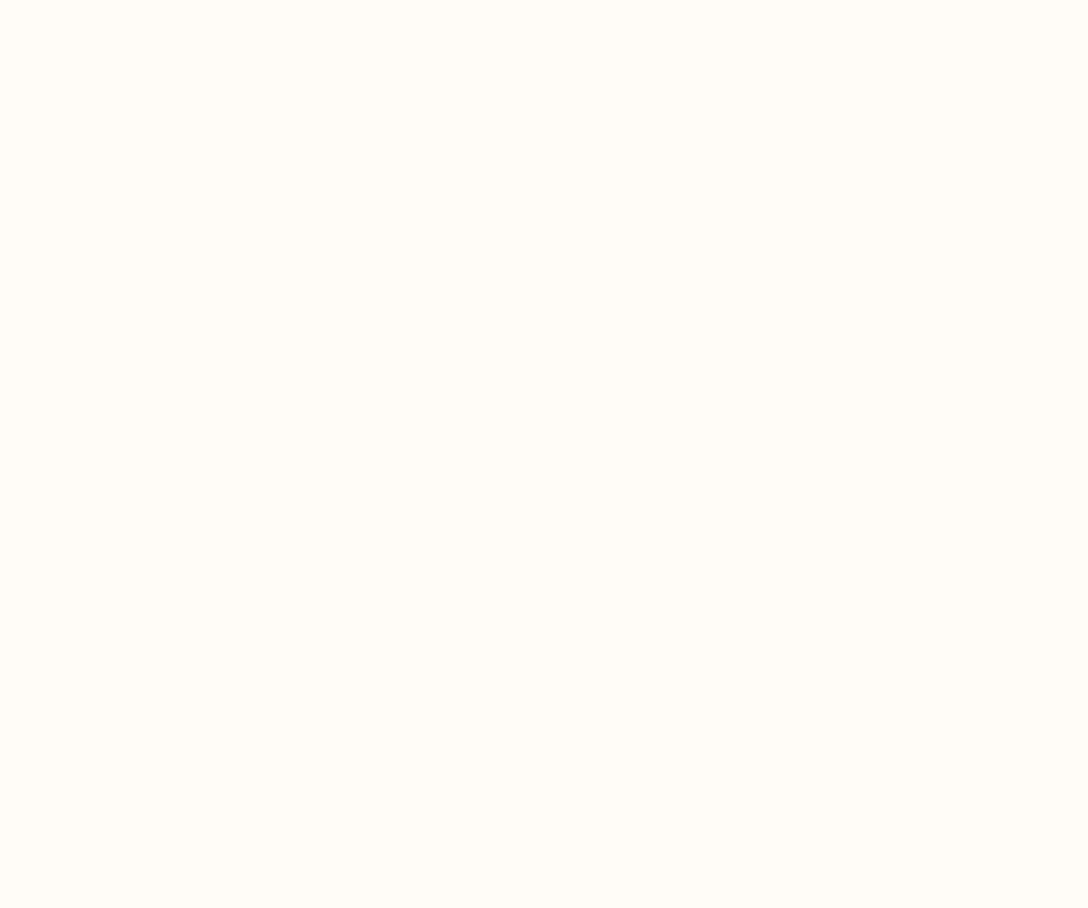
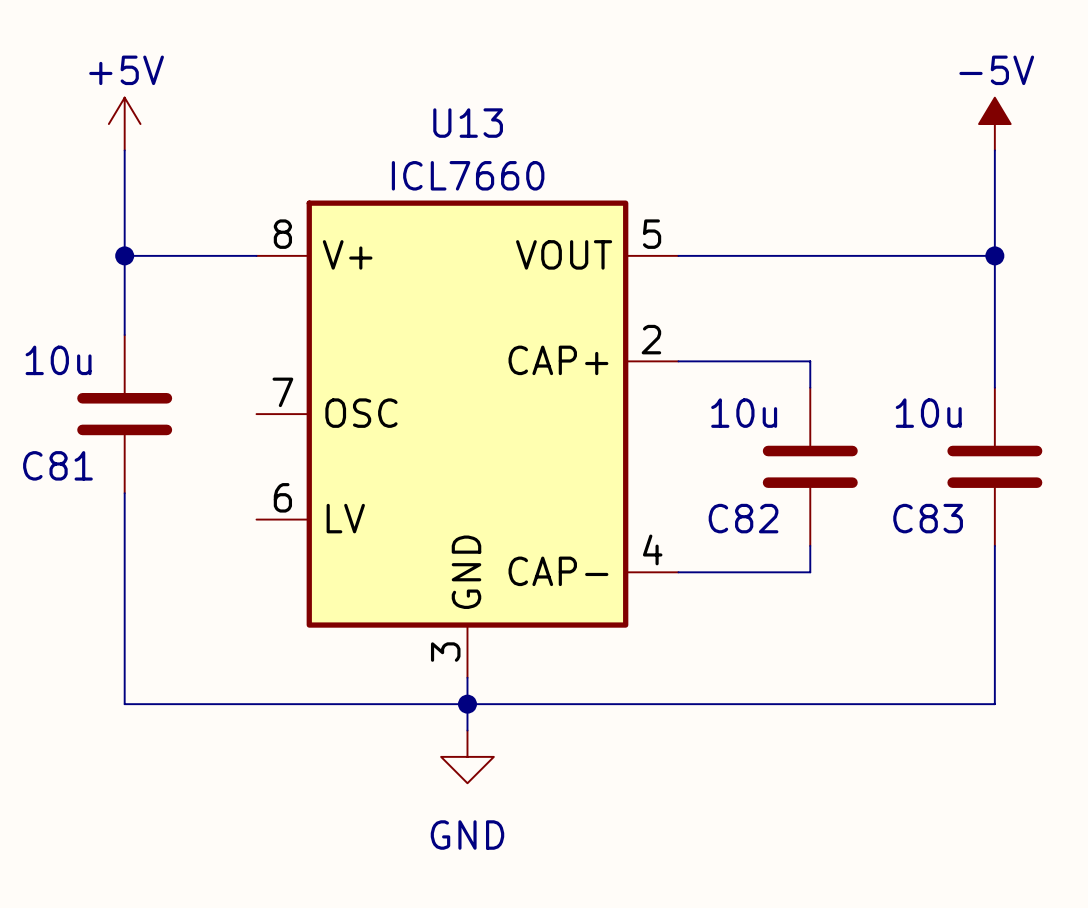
power symbol: none -> +5V (124, 124)
power symbol: none -> -5V (994, 124)
wire: none -> (124, 150) (124, 334)
wire: none -> (994, 150) (994, 387)
wire: none -> (124, 255) (256, 255)
junction: none -> (124, 255)
wire: none -> (678, 255) (994, 255)
junction: none -> (994, 255)
wire: none -> (678, 361) (810, 361) (810, 387)
C81: none -> 10u (124, 414)
U13: none -> ICL7660 (467, 439)
C82: none -> 10u (810, 466)
C83: none -> 10u (994, 466)
wire: none -> (124, 493) (124, 704) (994, 704) (994, 545)
wire: none -> (810, 545) (810, 572) (678, 572)
wire: none -> (467, 677) (467, 730)
junction: none -> (467, 704)
power symbol: none -> GND (467, 756)

